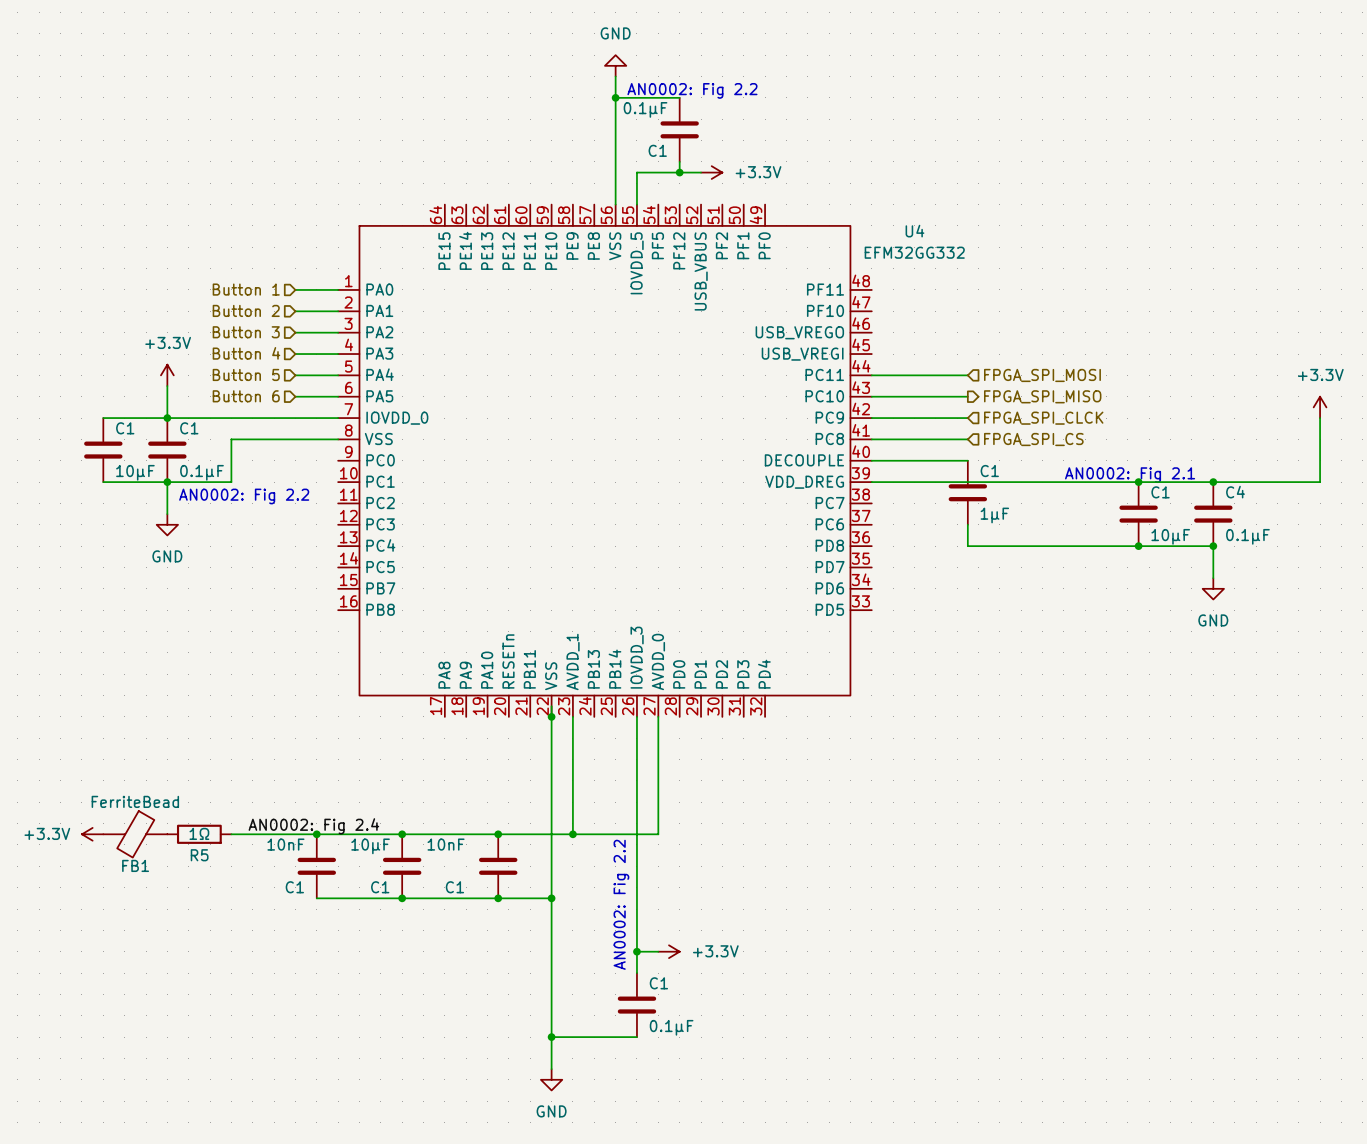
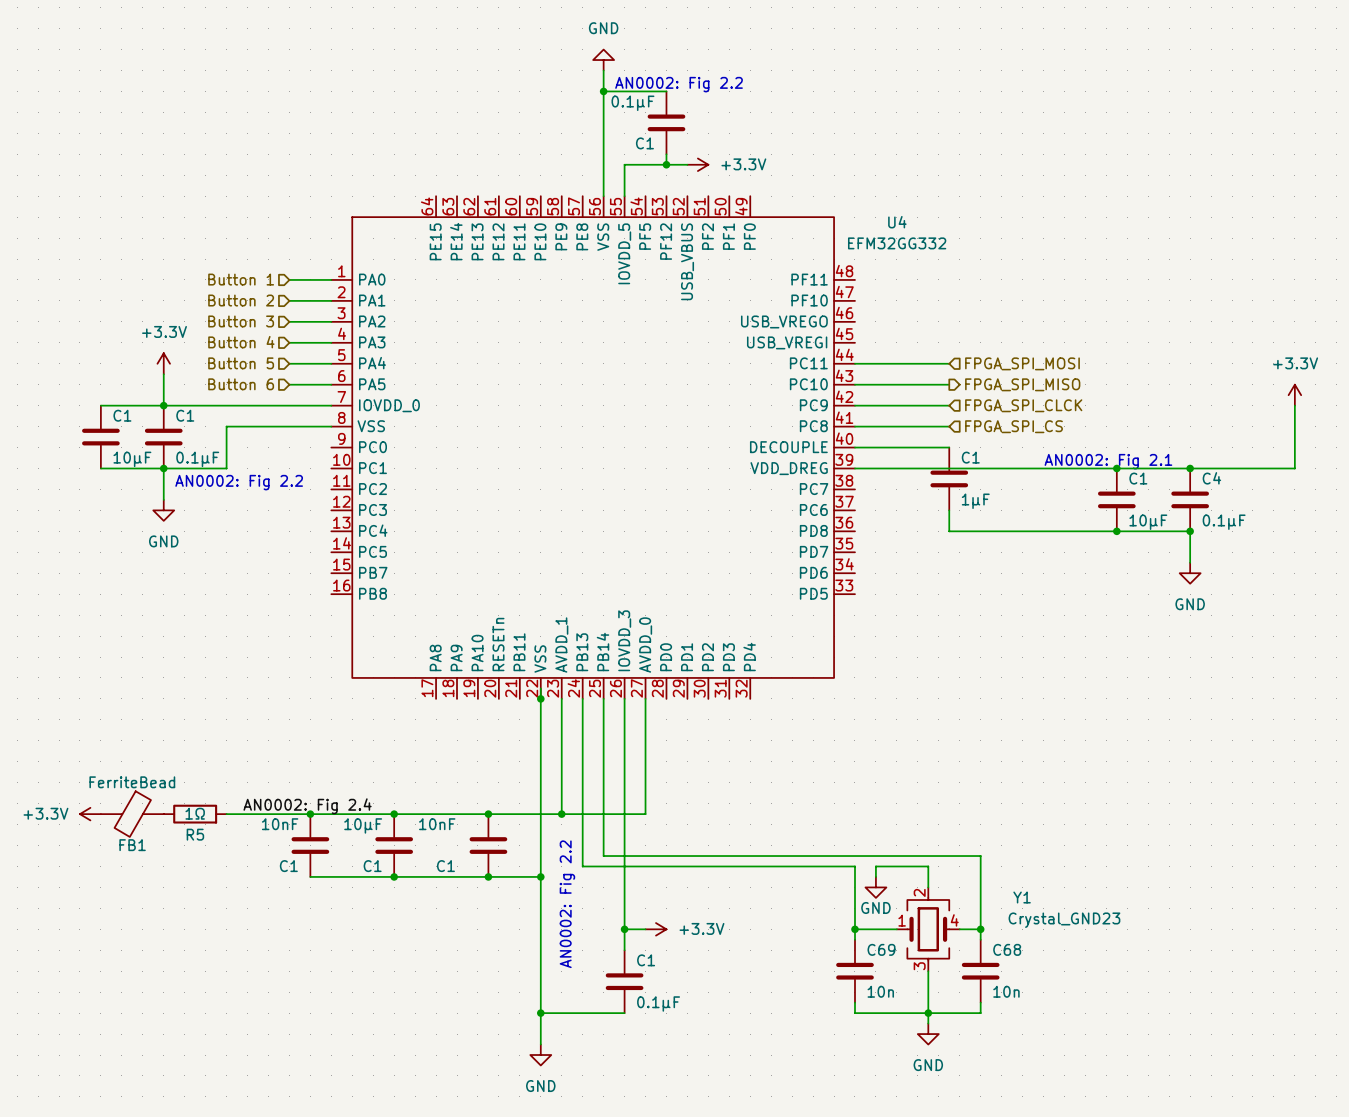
wire: none -> (582, 698) (582, 866) (854, 866) (854, 939)
wire: none -> (603, 698) (603, 856) (980, 856) (980, 939)
wire: none -> (875, 876) (875, 866) (928, 866) (928, 887)
text position: AN0002: Fig 2.2 (621, 904) -> AN0002: Fig 2.2 (567, 904)
power symbol: none -> GND (875, 887)
wire: none -> (854, 929) (896, 929)
junction: none -> (854, 929)
Y1: none -> Crystal_GND23 (928, 929)
wire: none -> (959, 929) (980, 929)
junction: none -> (980, 929)
C69: none -> 10n (854, 971)
wire: none -> (928, 971) (928, 1023)
C68: none -> 10n (980, 971)
wire: none -> (854, 1002) (854, 1013) (980, 1013) (980, 1002)
junction: none -> (928, 1013)
power symbol: none -> GND (928, 1034)

